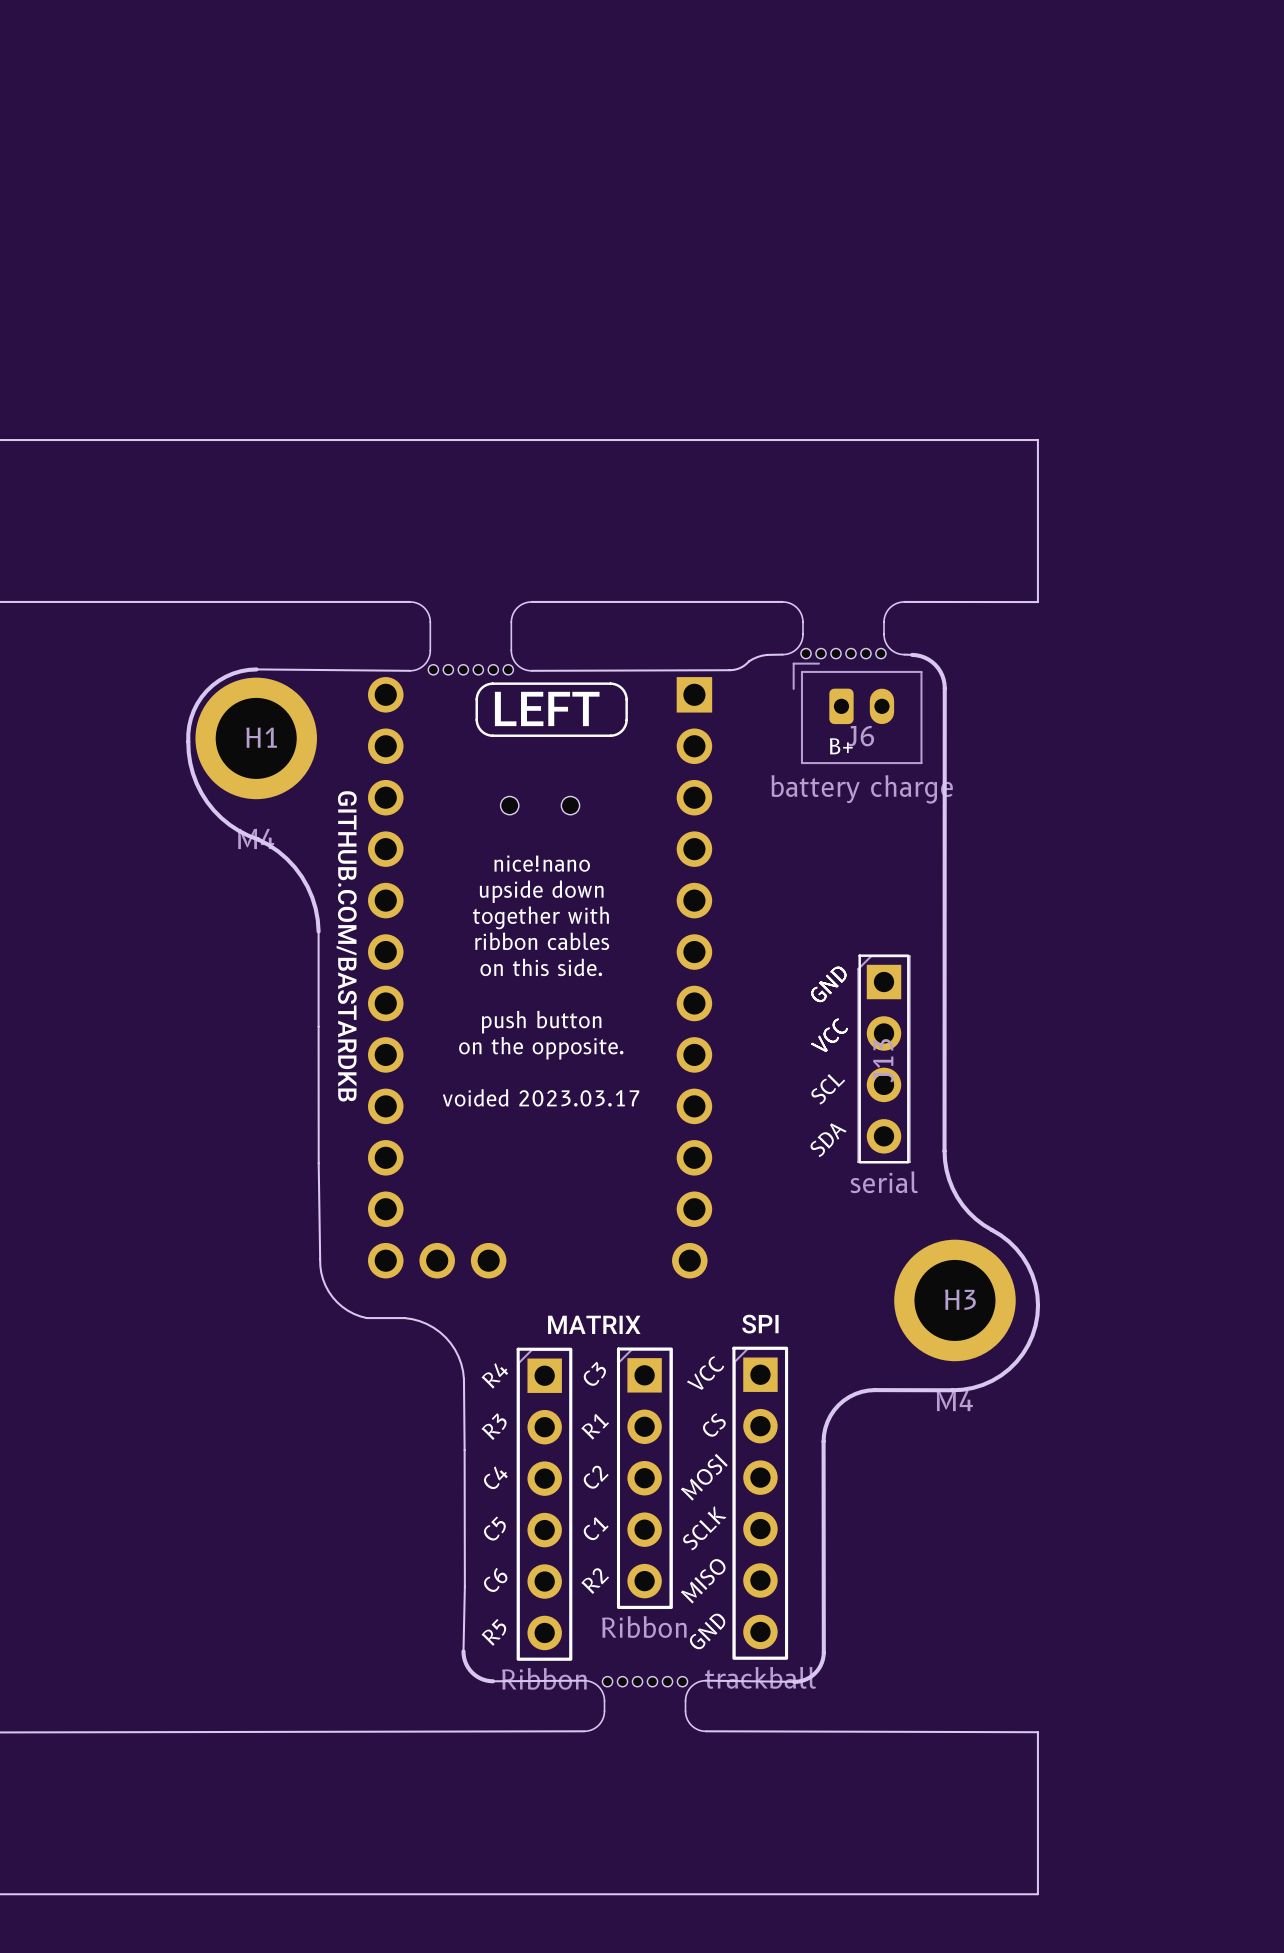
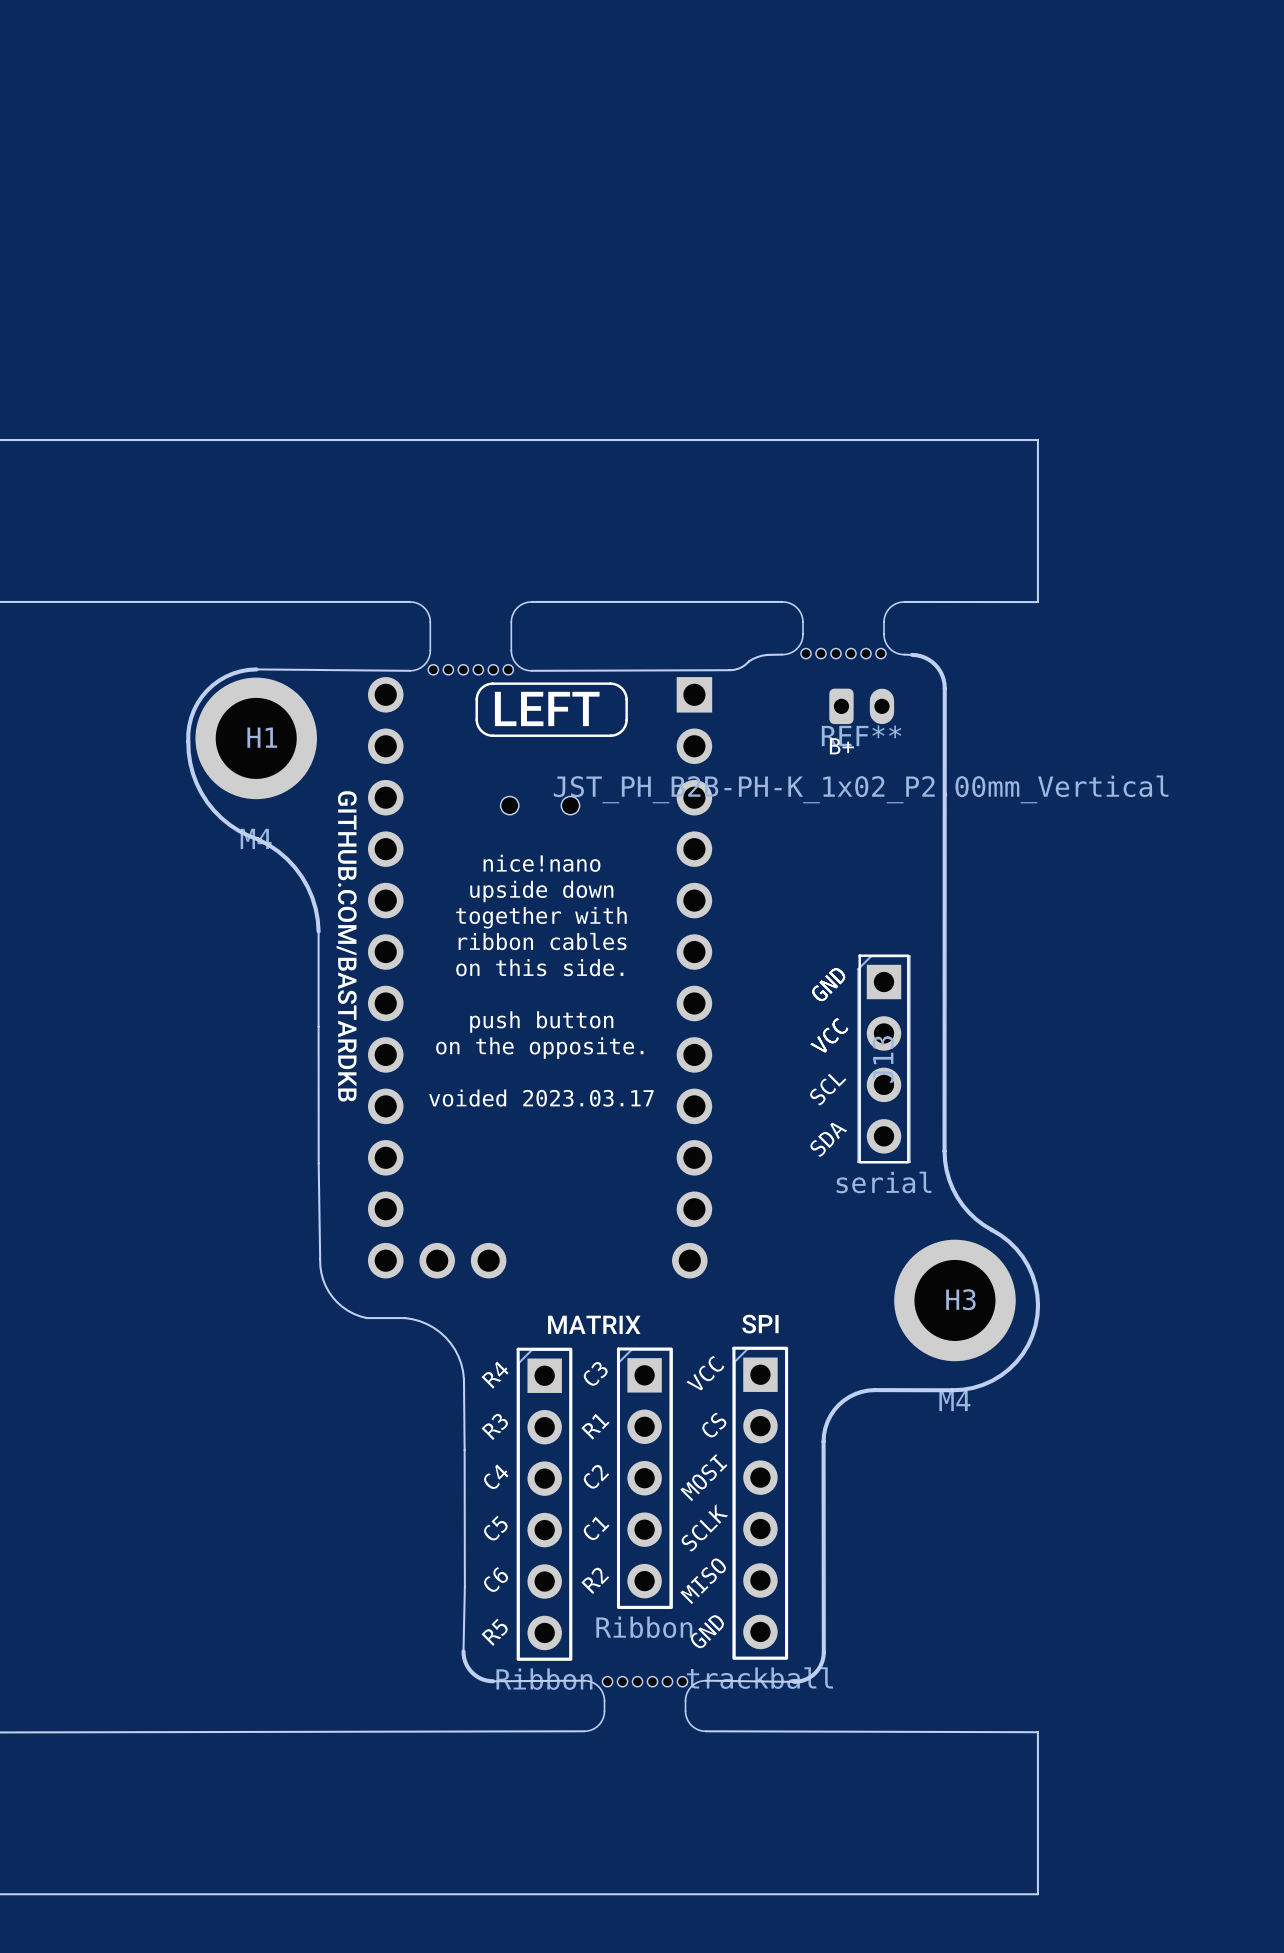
REF**: none -> JST_PH_B2B-PH-K_1x02_P2.00mm_Vertical (861, 706)
J6: battery charge (857, 713) -> none

